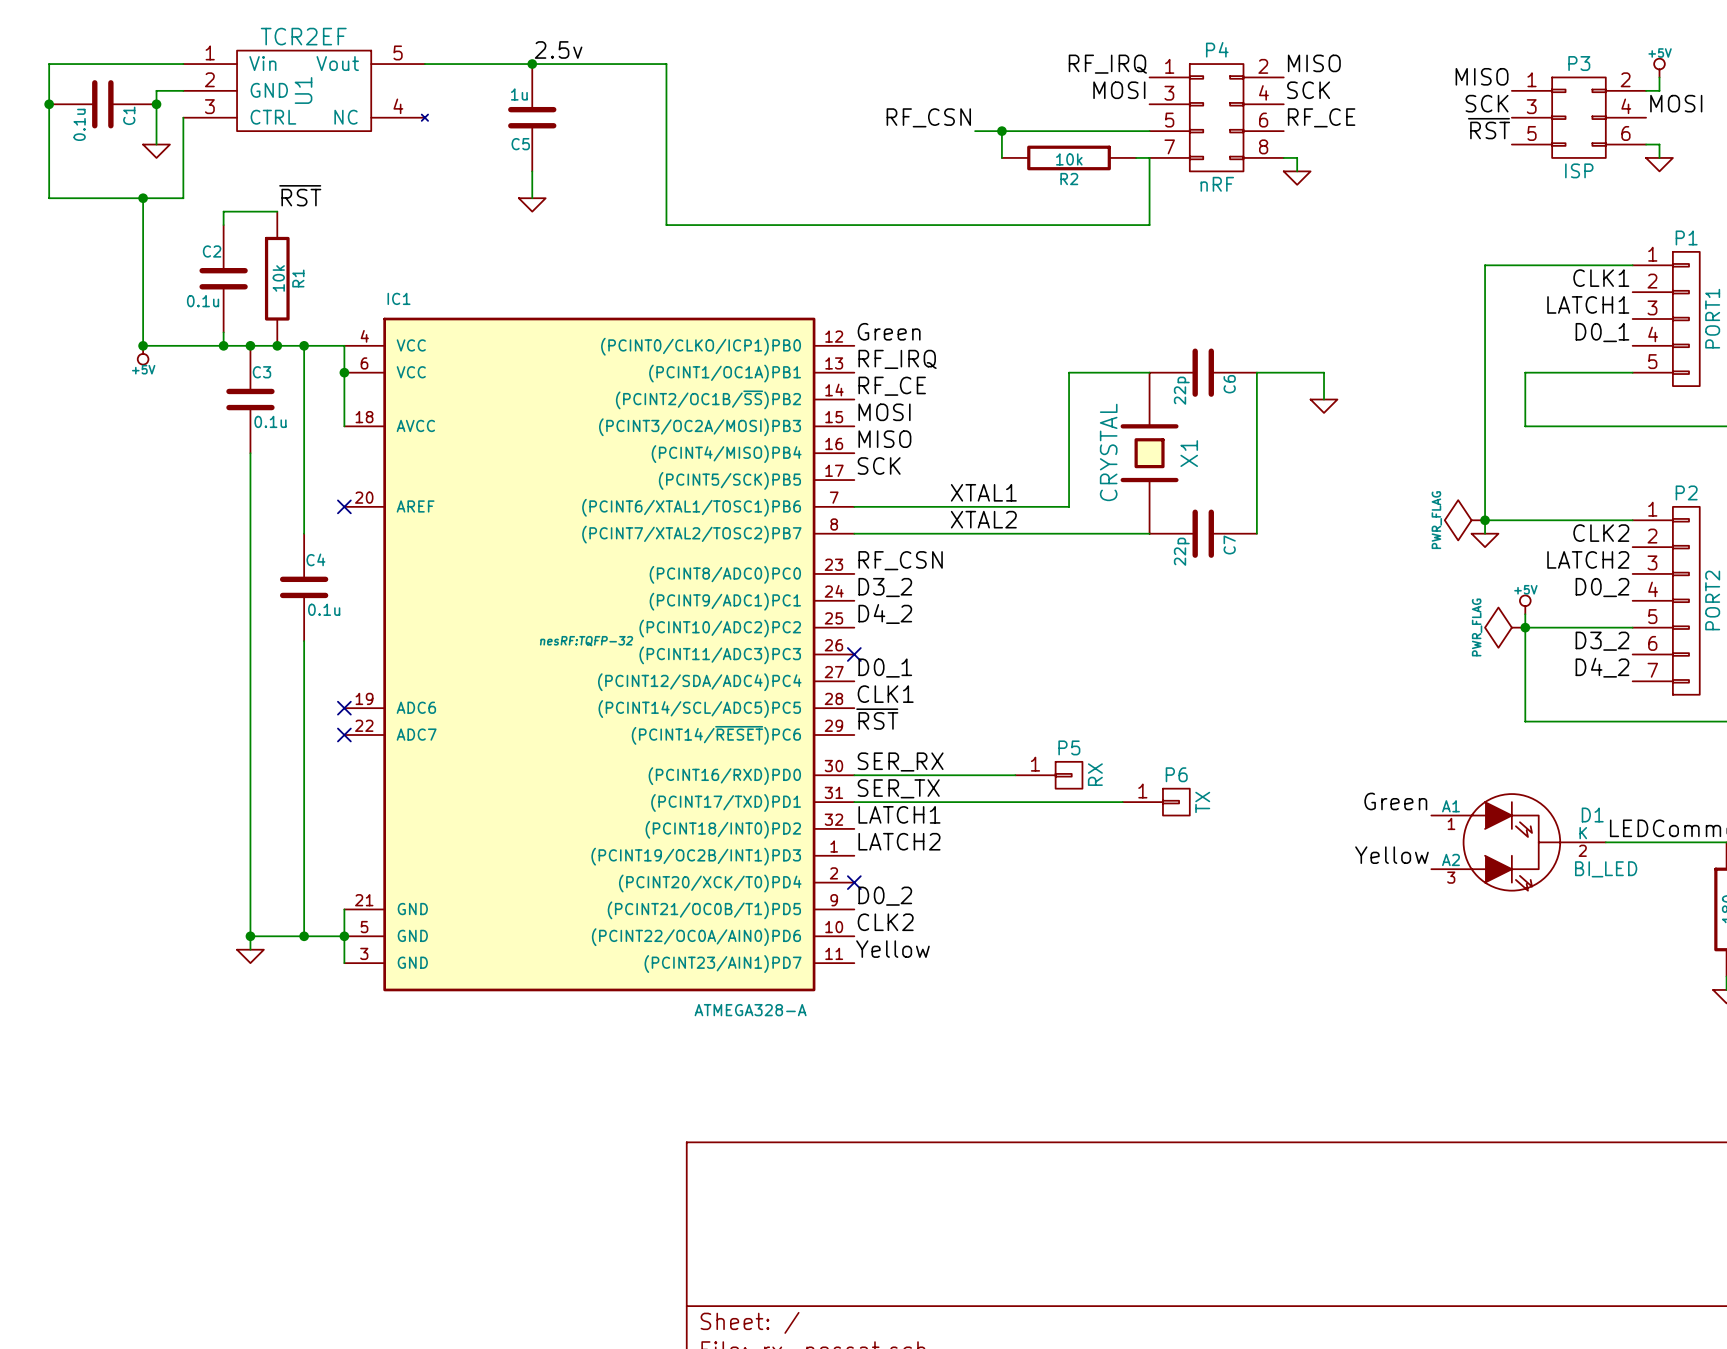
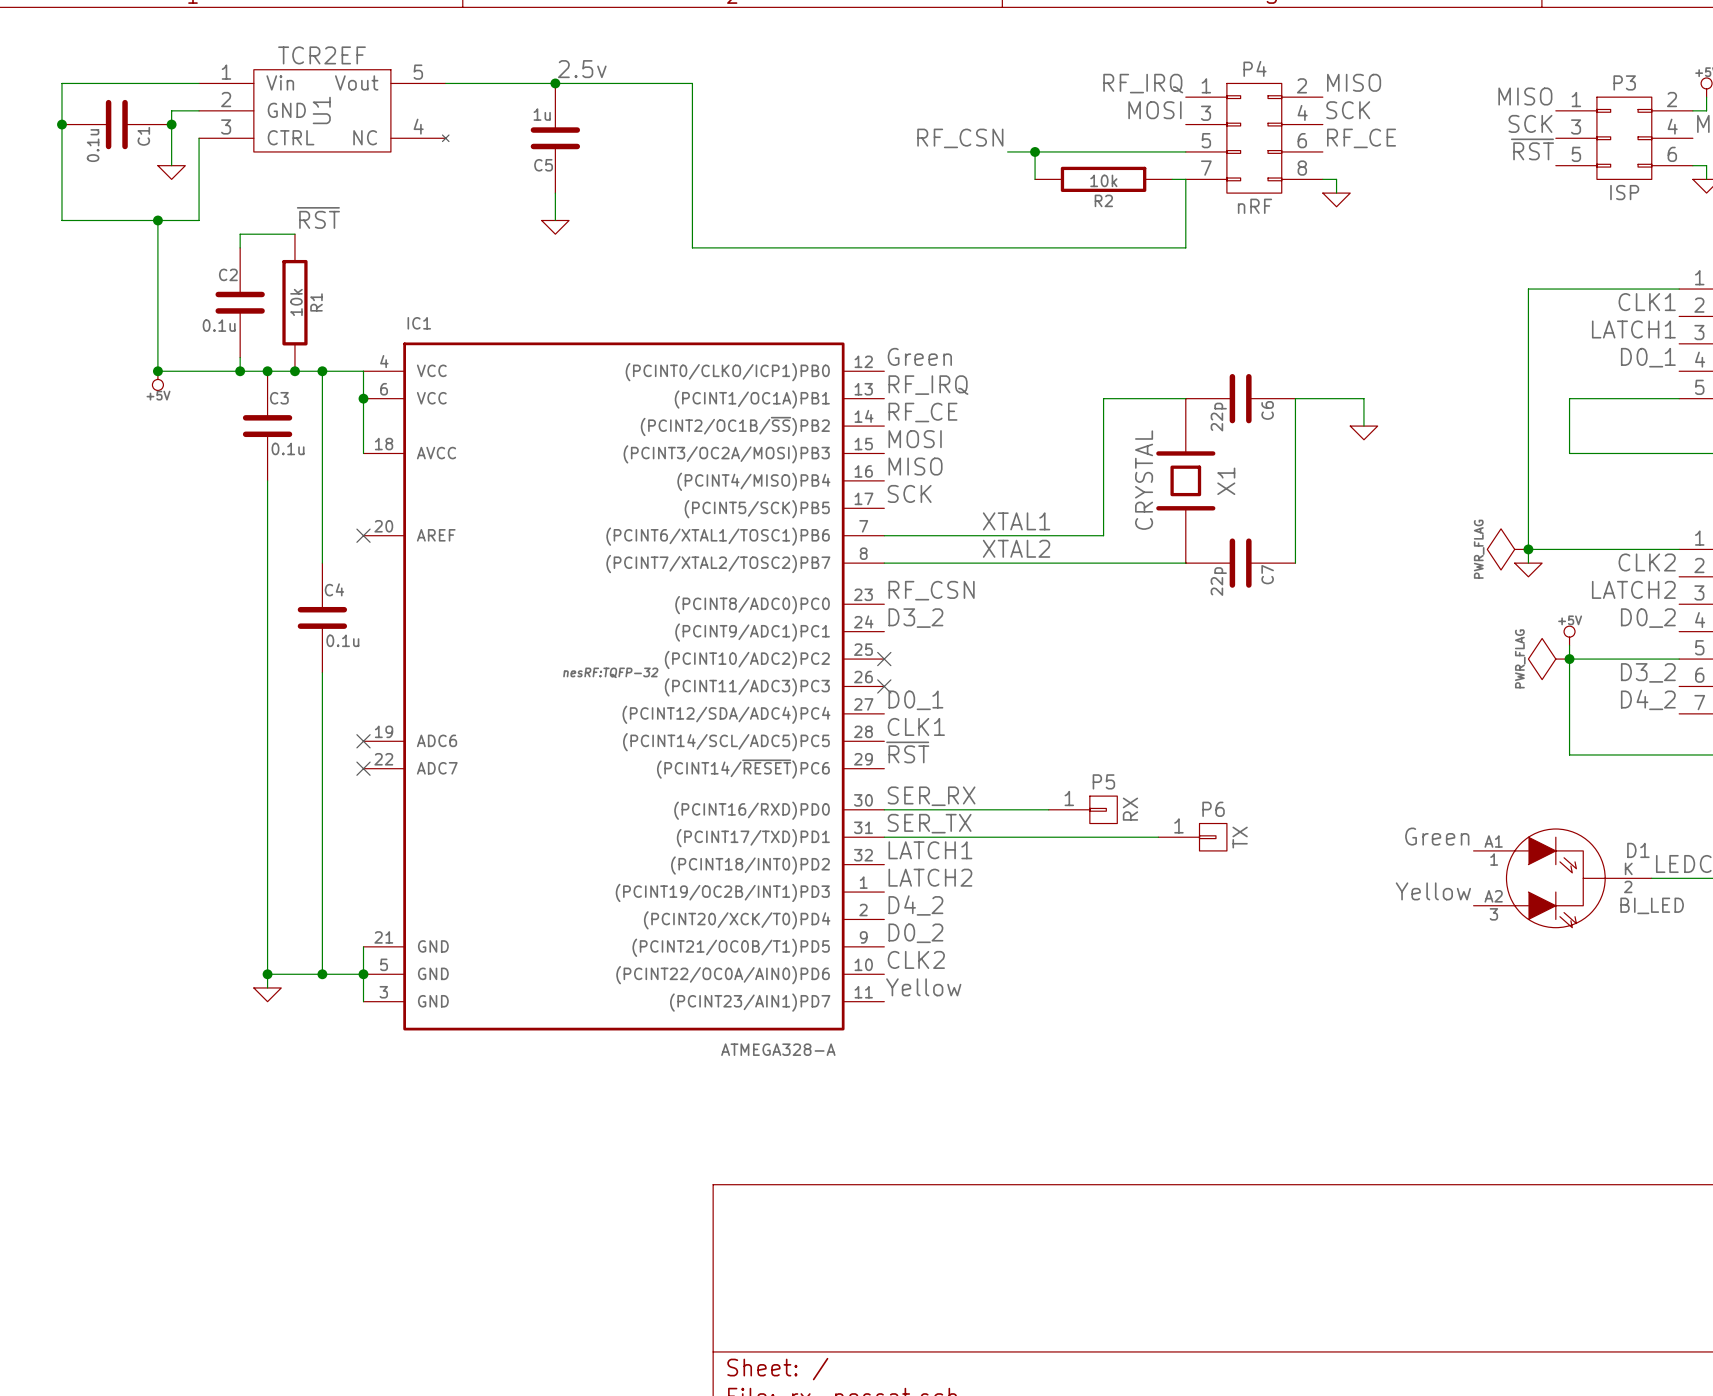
label position: D4_2 (885, 613) -> D4_2 (915, 905)
no-connect mark: none -> (884, 659)
no-connect mark: (854, 882) -> none

